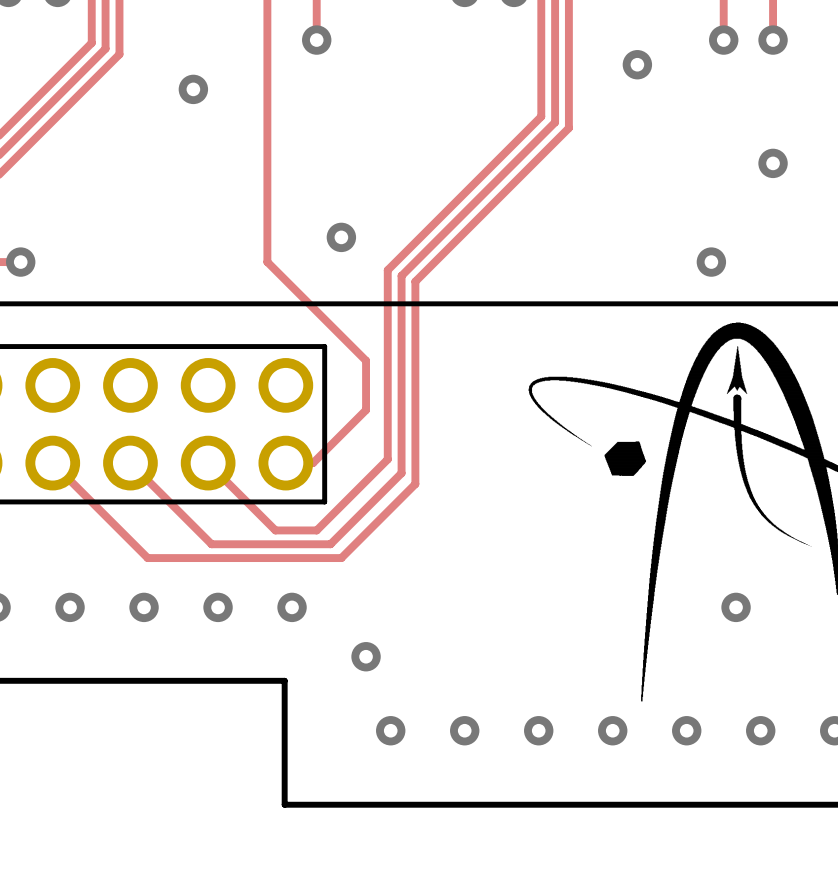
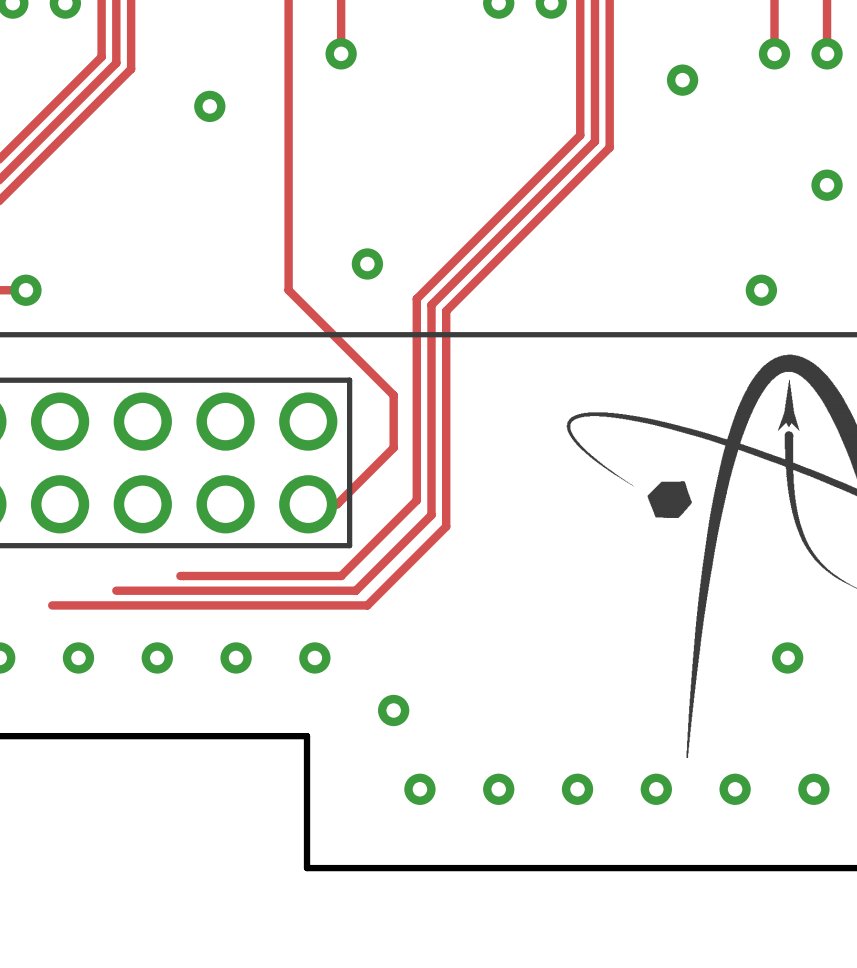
track: (52, 463) (147, 558) -> (52, 605) (161, 605)
track: (130, 463) (211, 544) -> (116, 590) (229, 590)
track: (208, 463) (275, 530) -> (180, 576) (297, 576)

